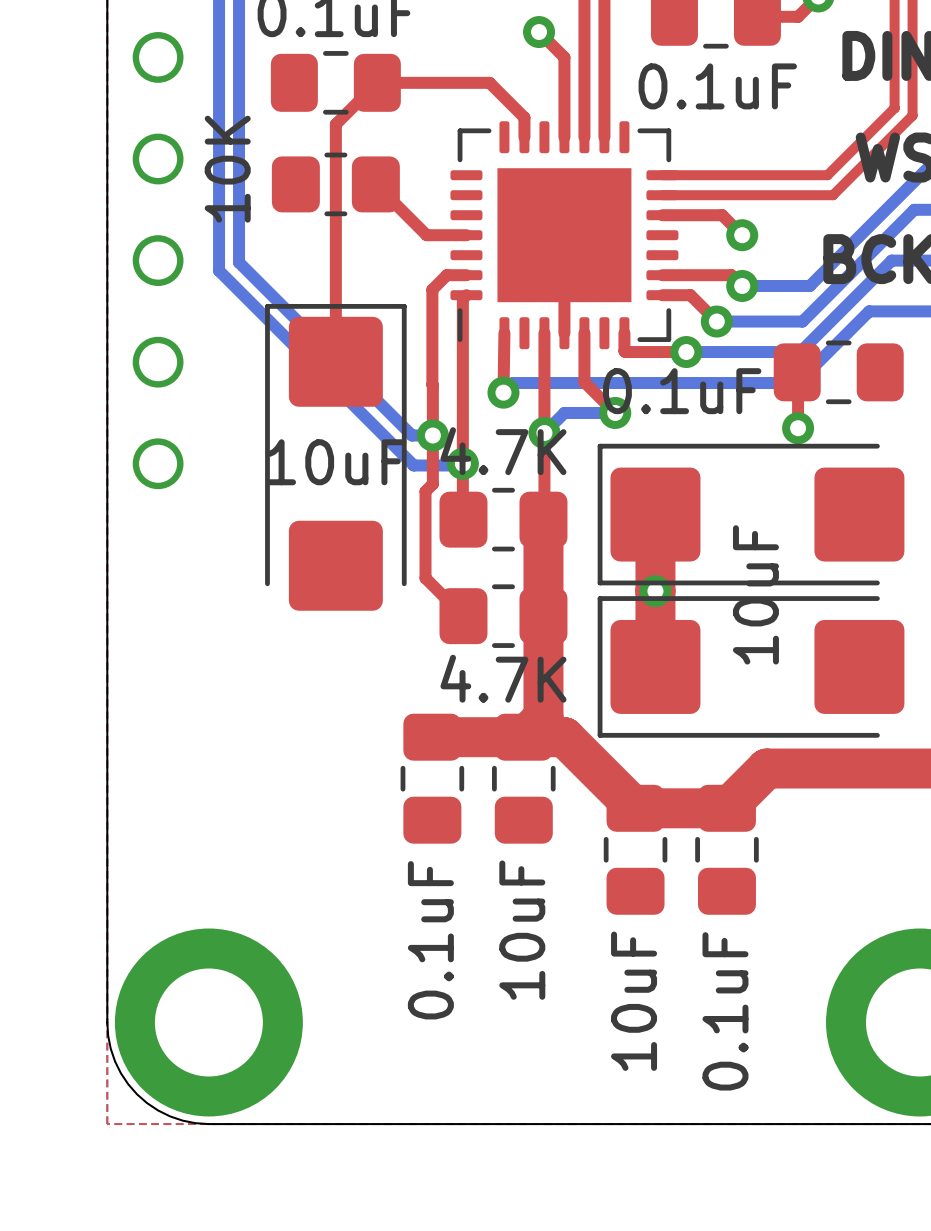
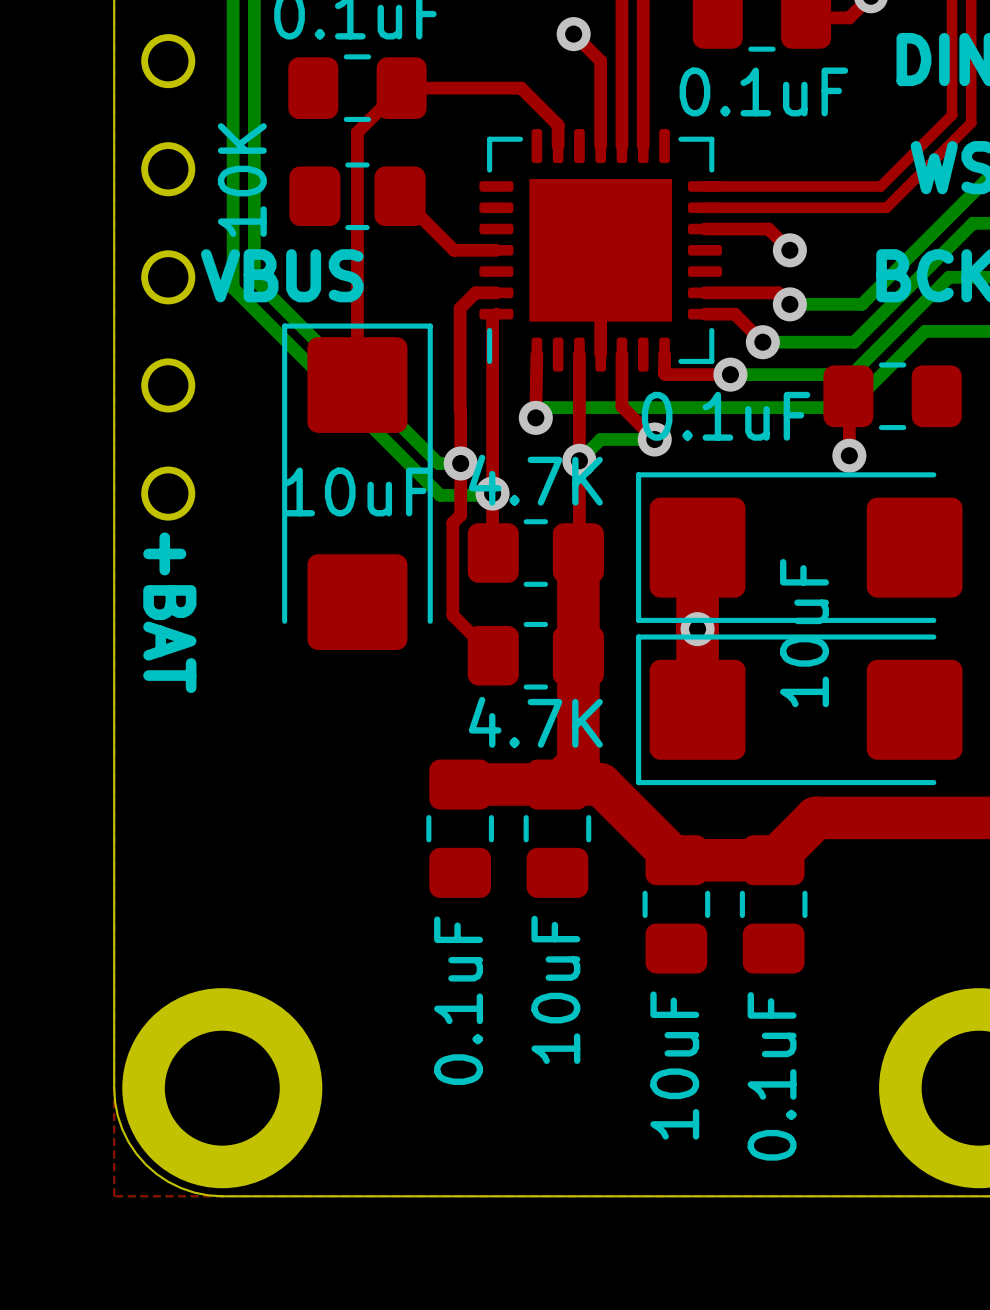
text: none -> VBUS (282, 275)
text: none -> +BAT (169, 612)

